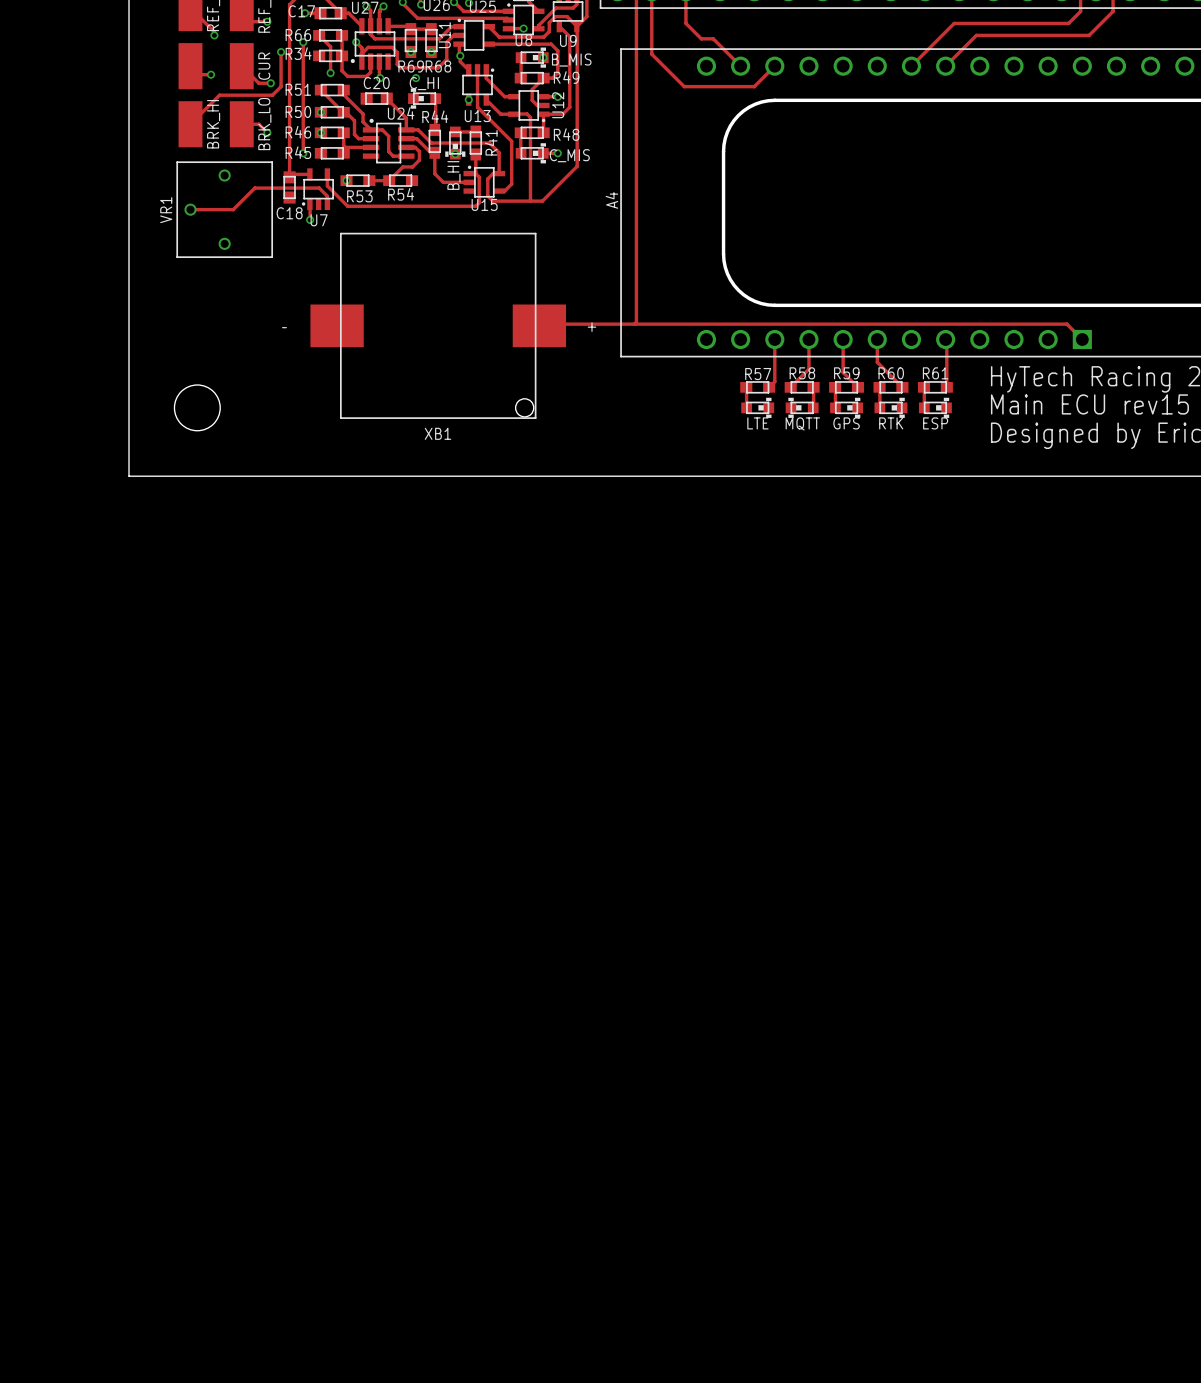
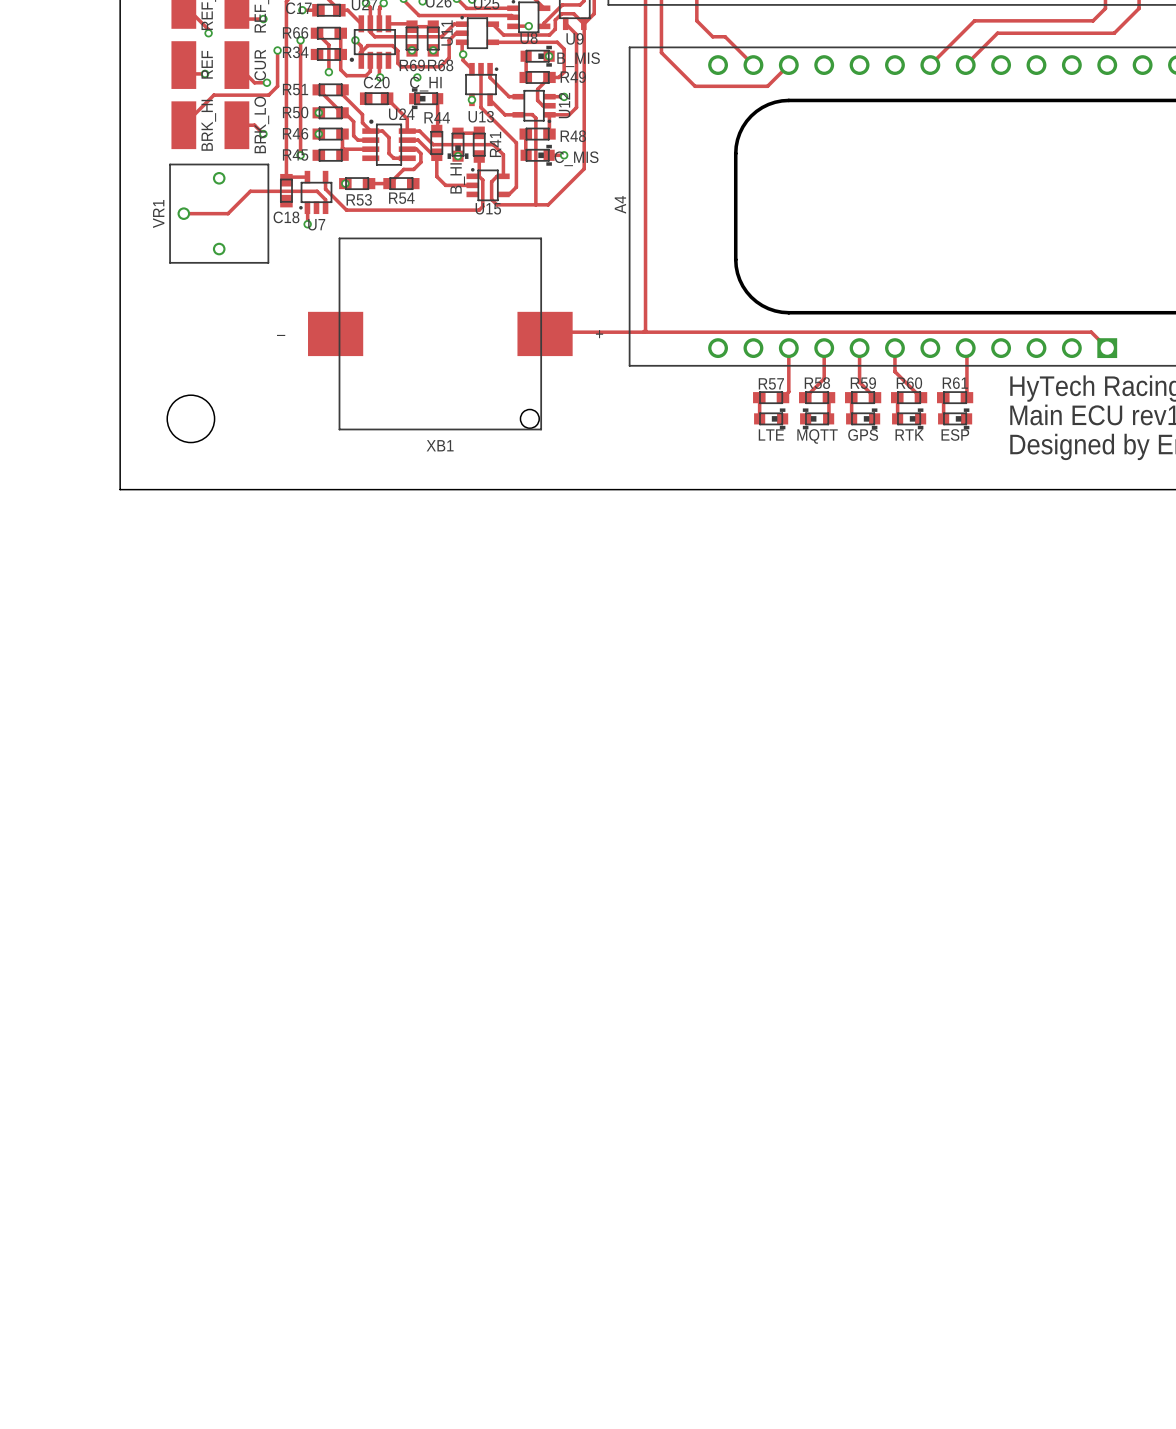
part text: none -> REF (207, 64)

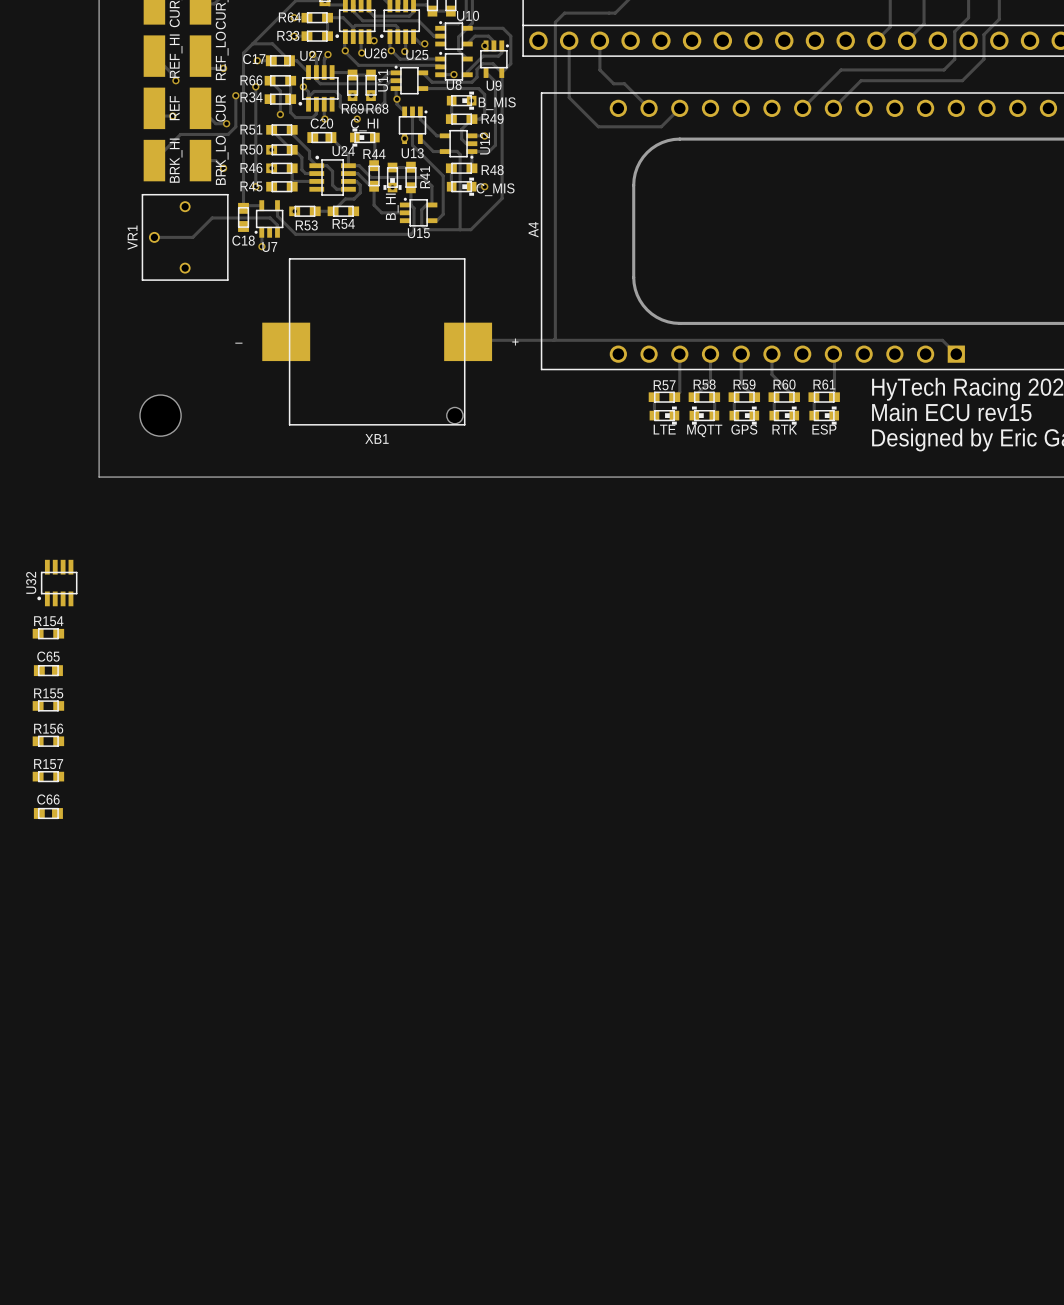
U32: none -> (57, 583)
R154: none -> (48, 633)
C65: none -> (48, 670)
R155: none -> (48, 705)
R156: none -> (48, 741)
R157: none -> (48, 776)
C66: none -> (48, 813)

